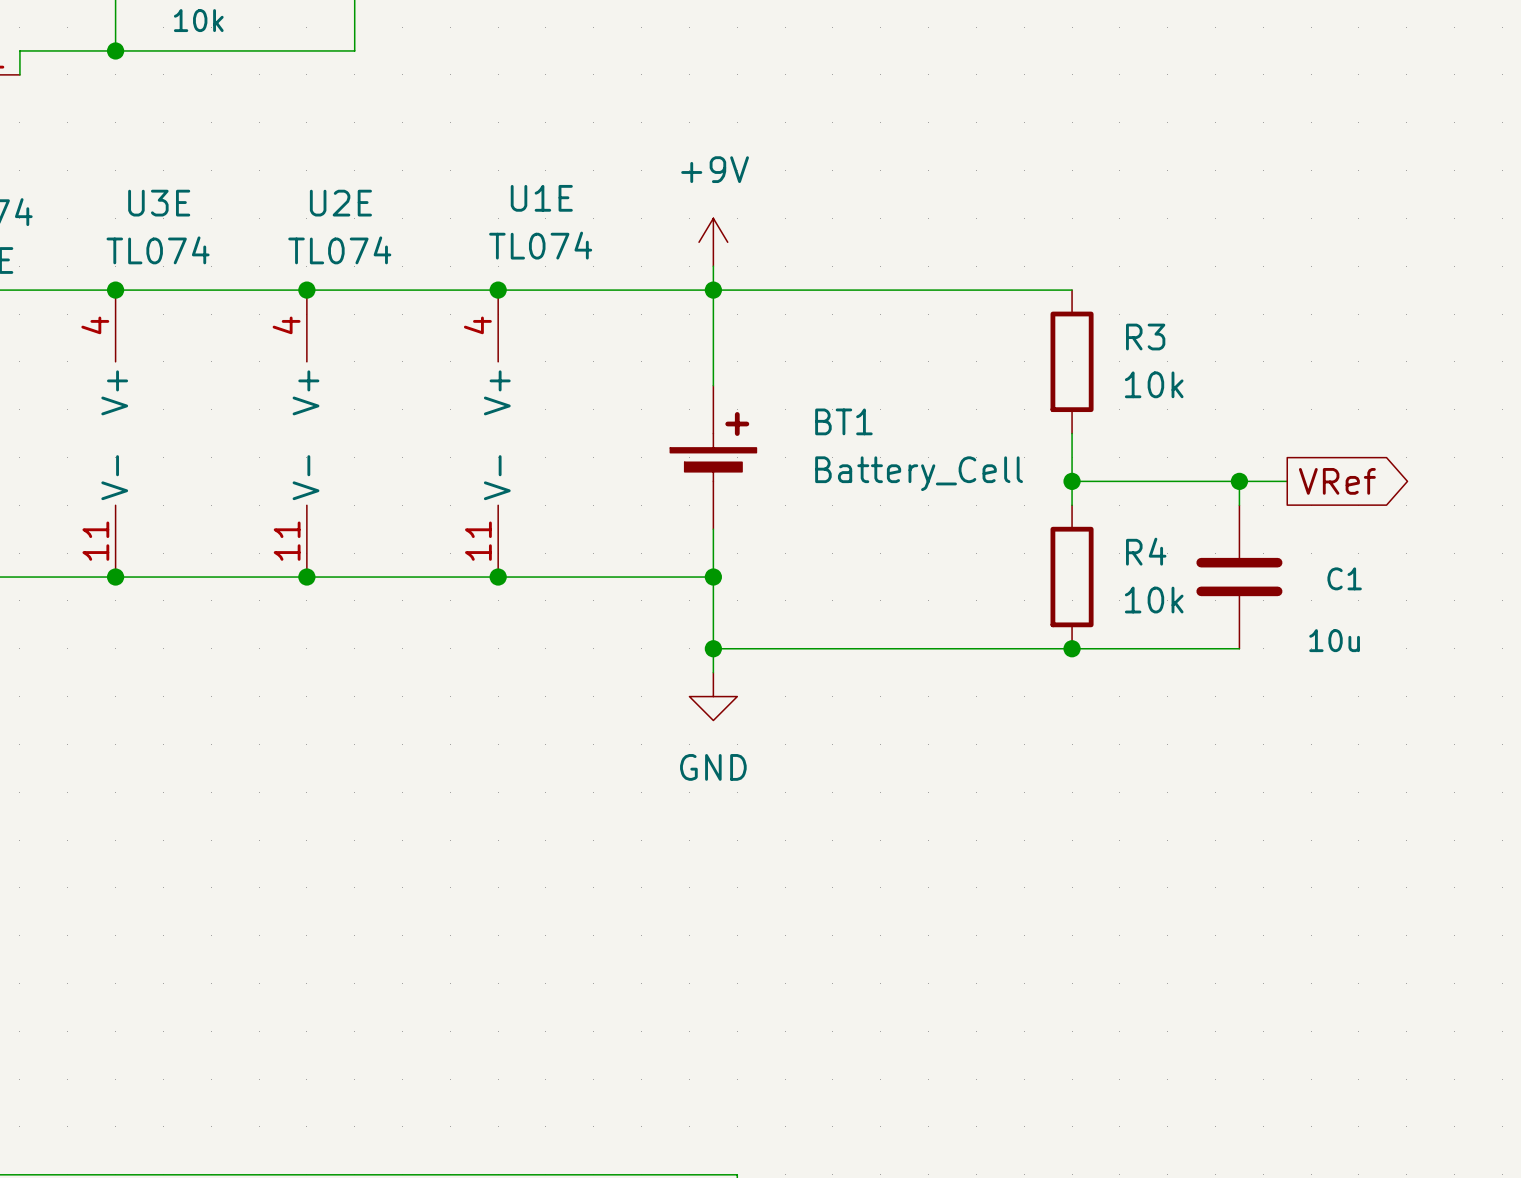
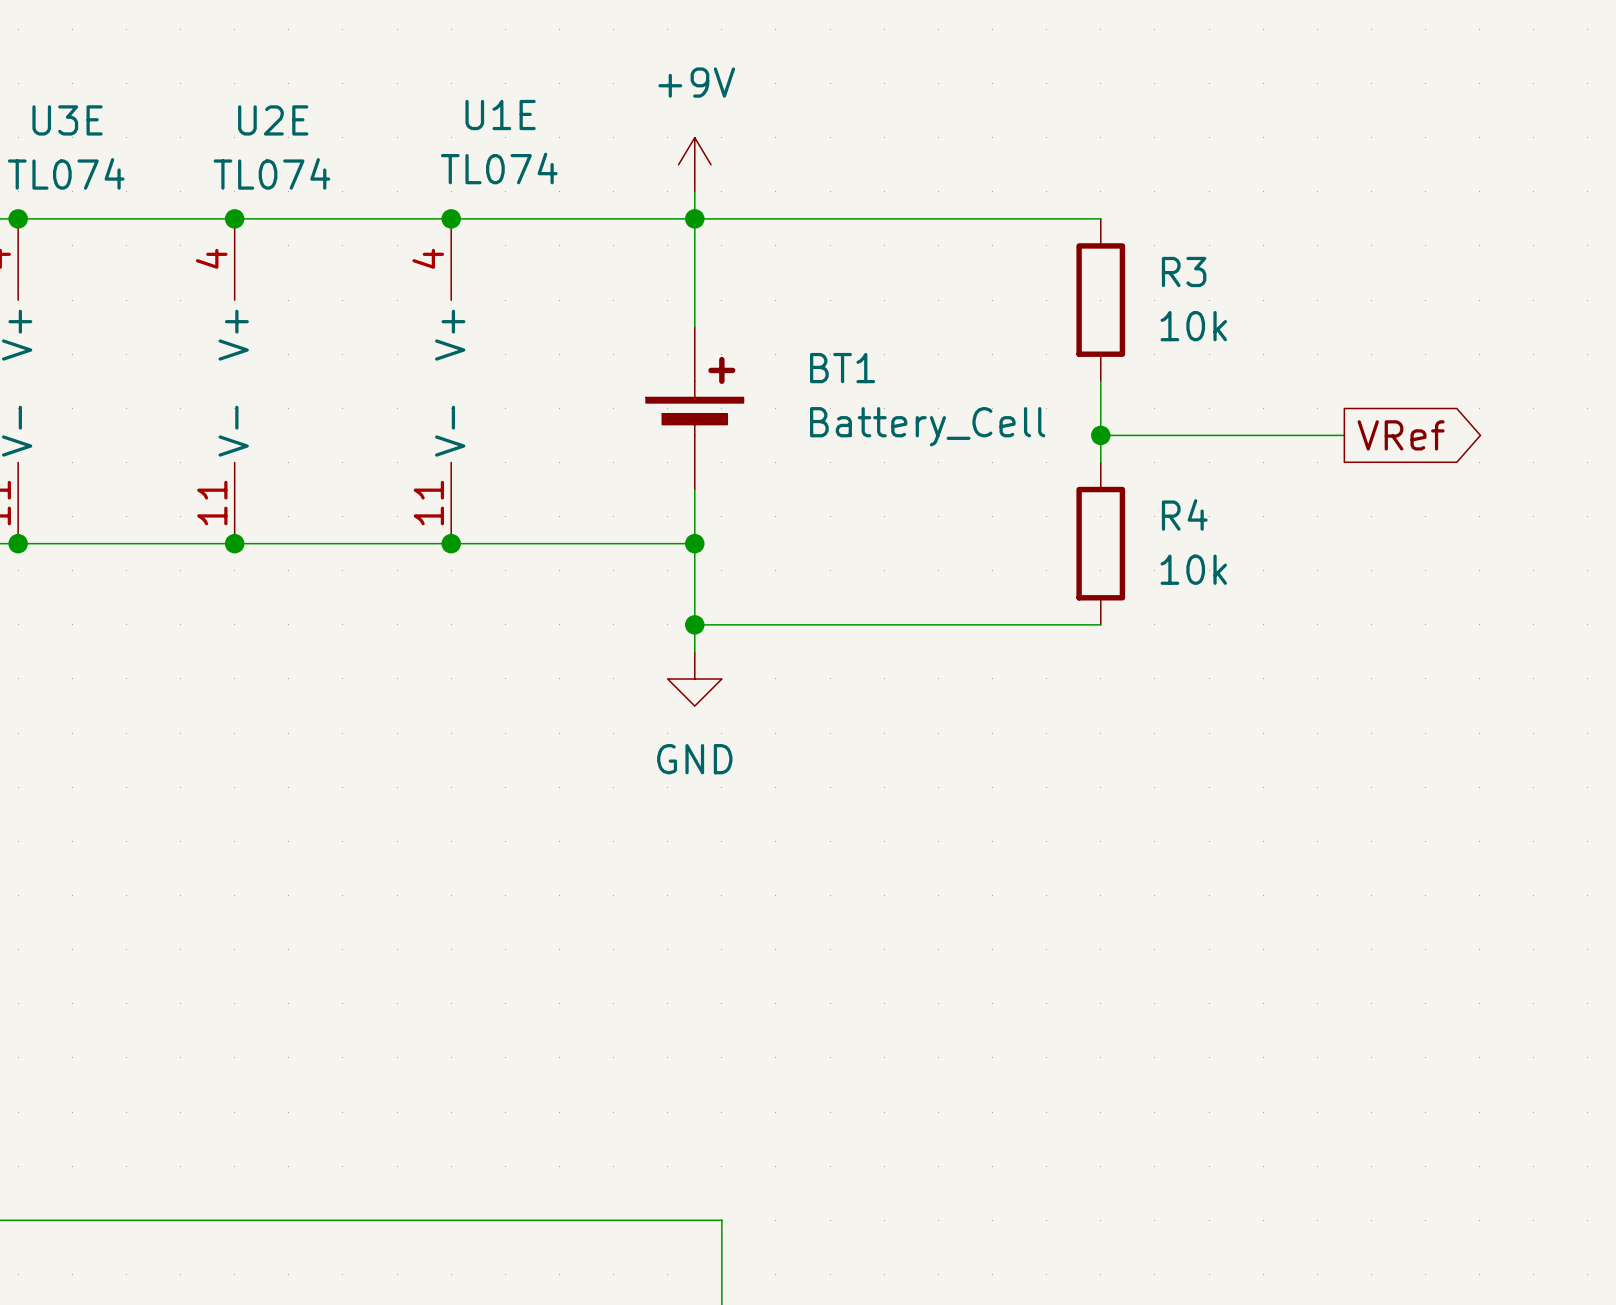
wire: (1239, 481) (1239, 505) -> none
junction: (1239, 481) -> none
C1: 10u (1239, 577) -> none
wire: (1072, 648) (1239, 648) -> none
junction: (1072, 648) -> none

